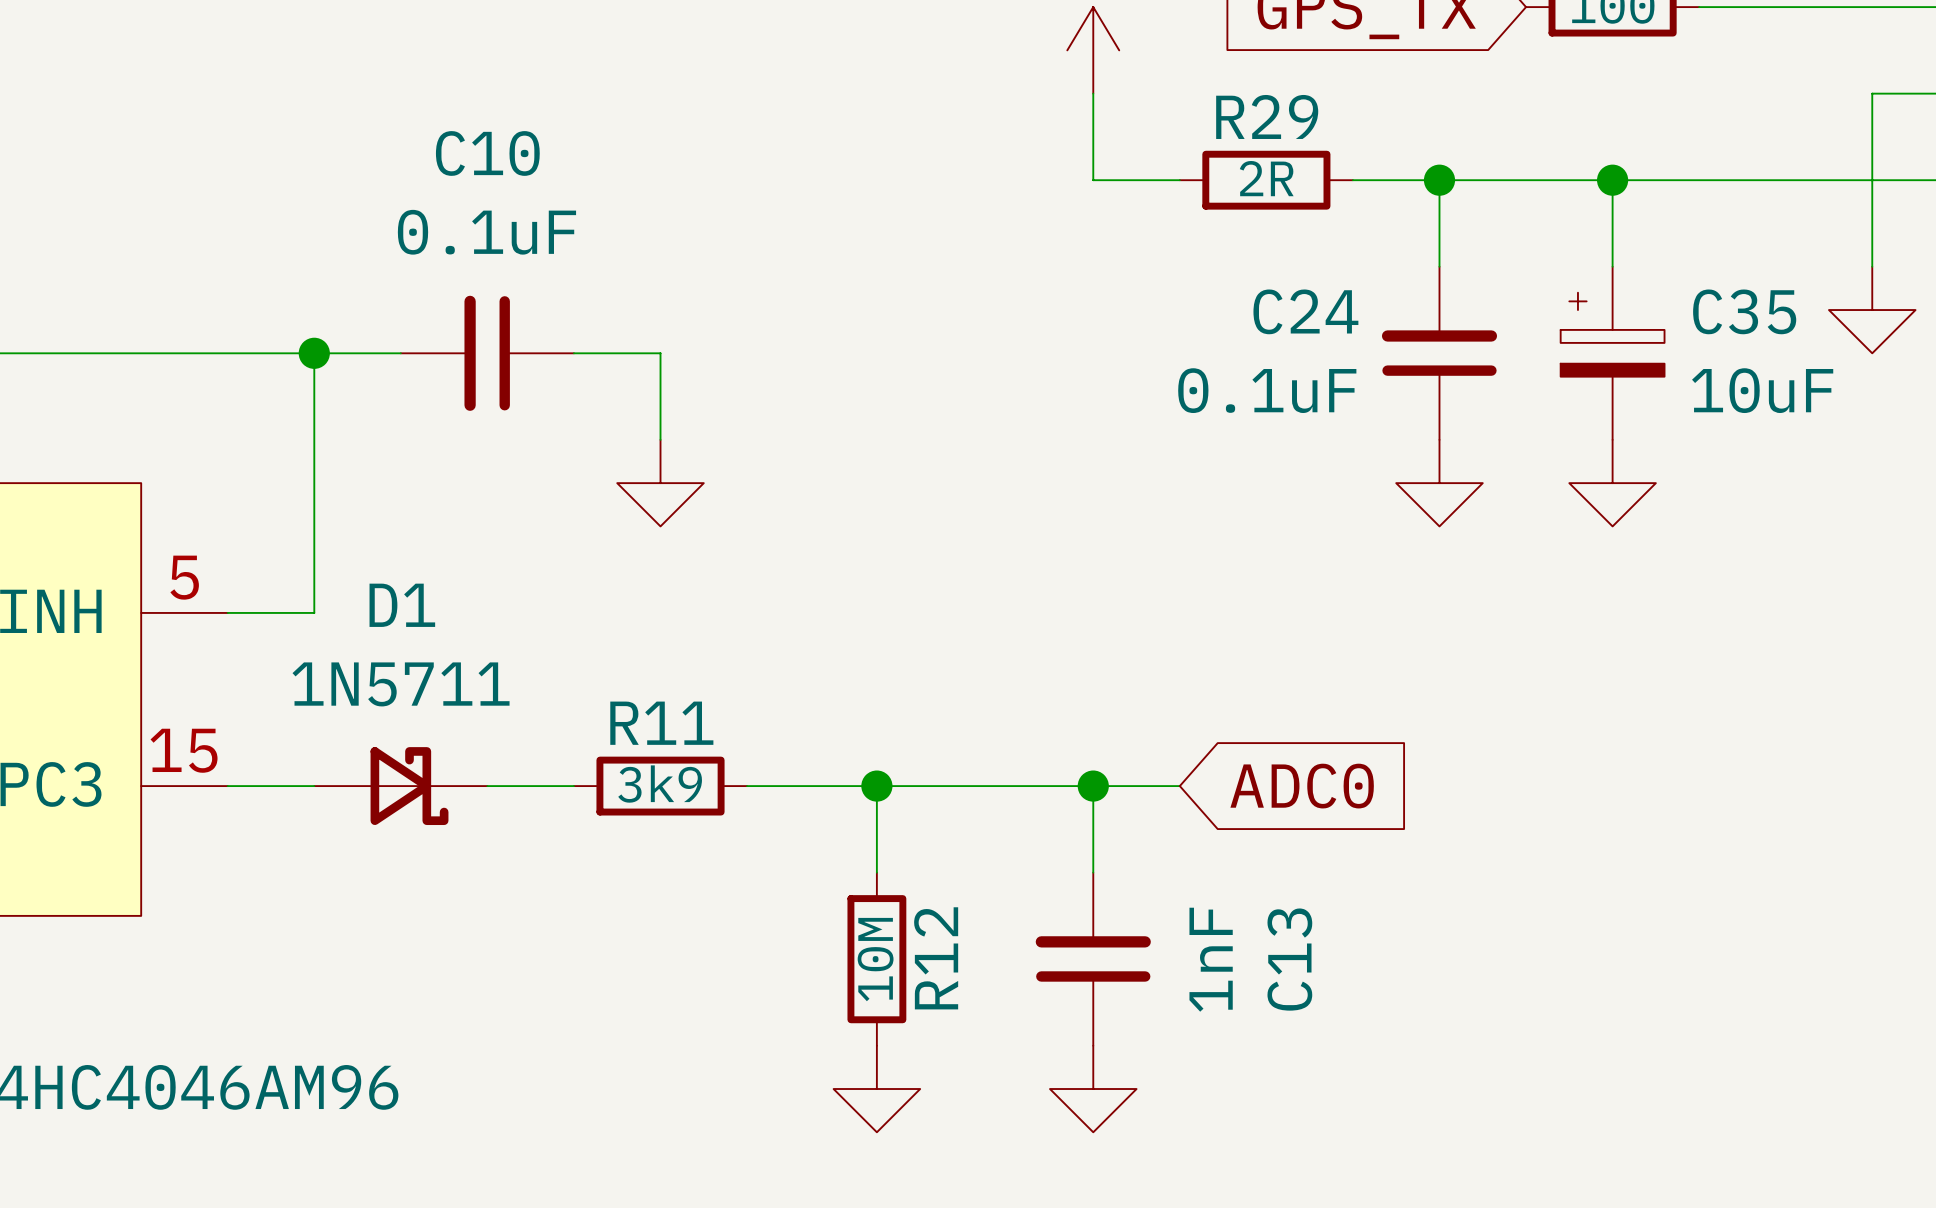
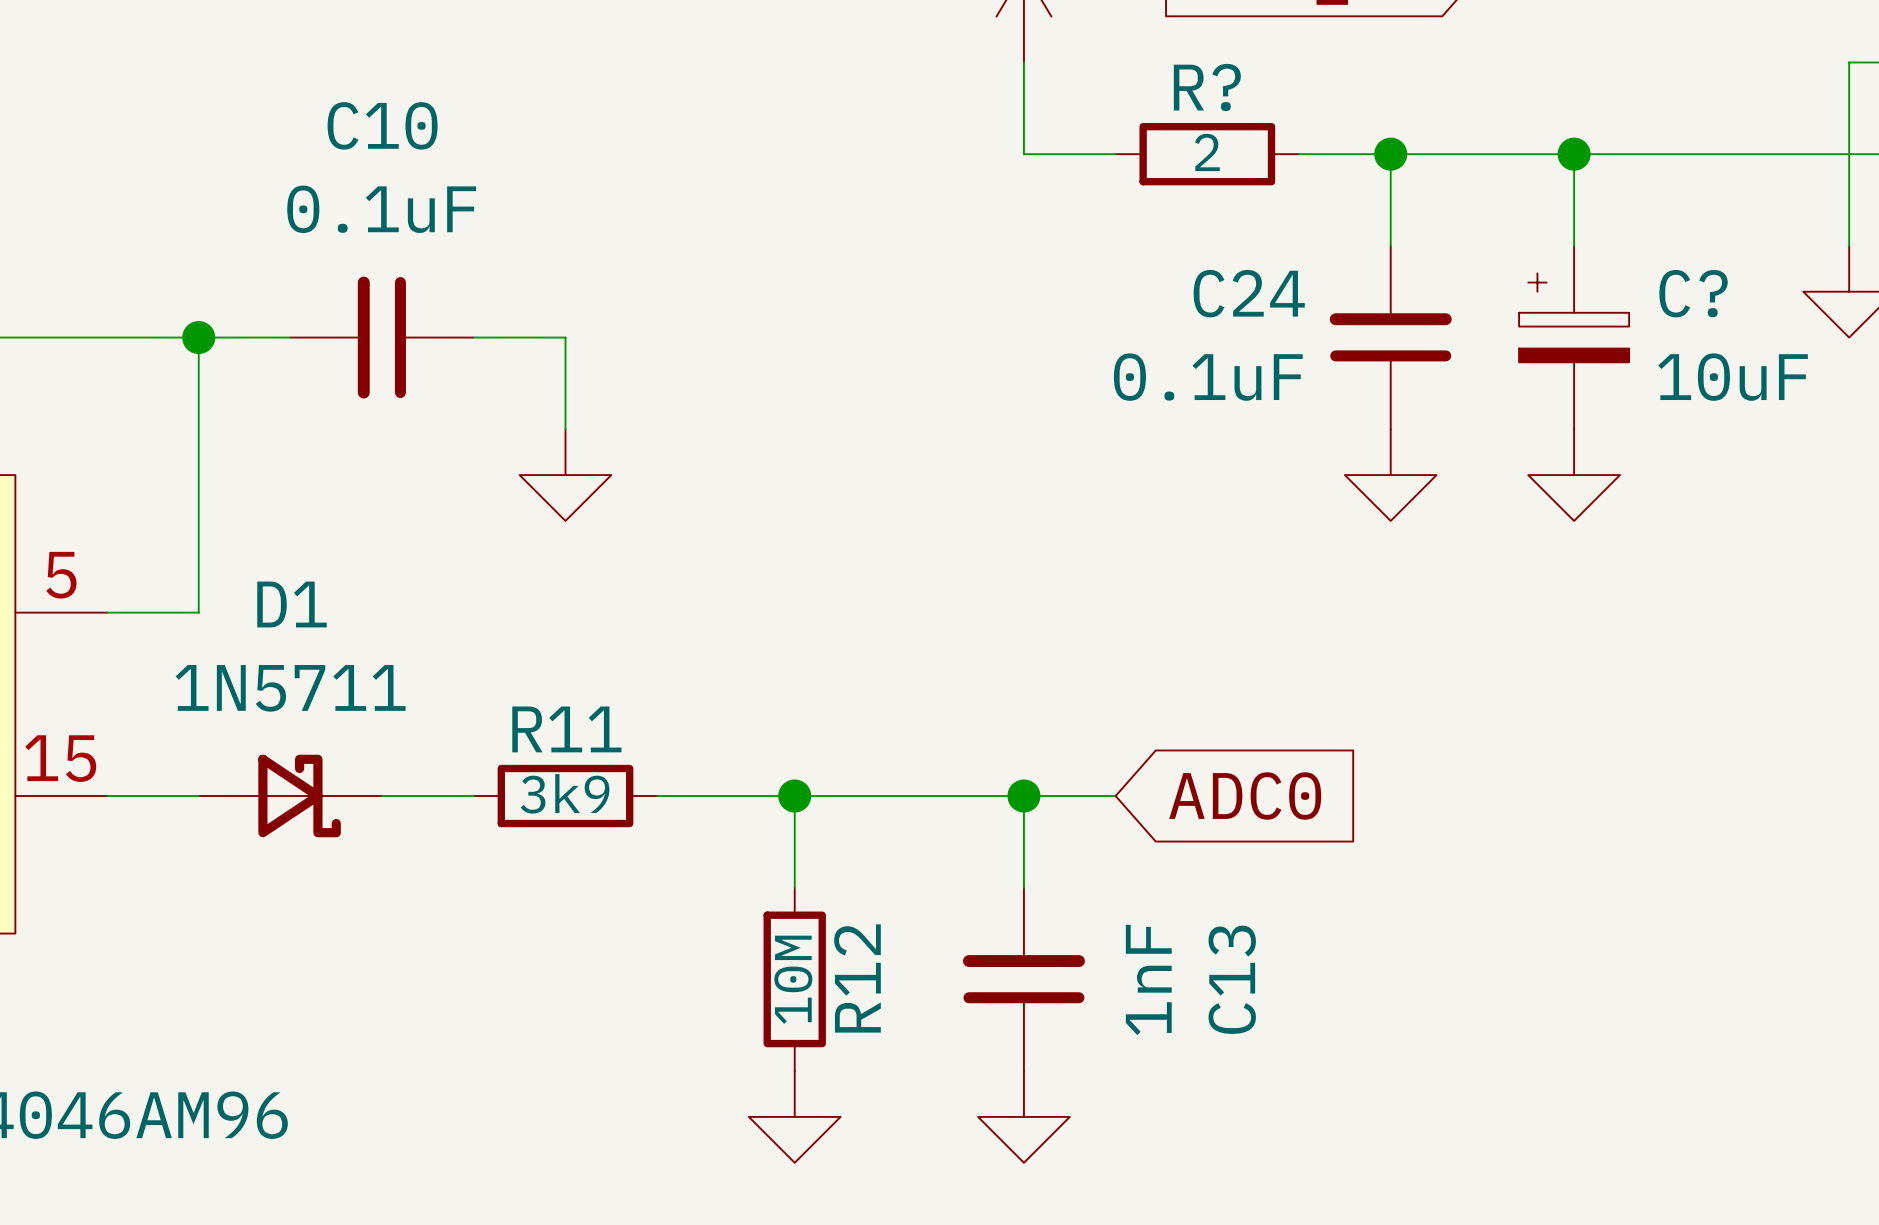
R29 name: R29 (1267, 116) -> R? (1207, 87)
R29 value: 2R (1266, 178) -> 2 (1207, 152)
C35 name: C35 (1744, 311) -> C? (1693, 293)

